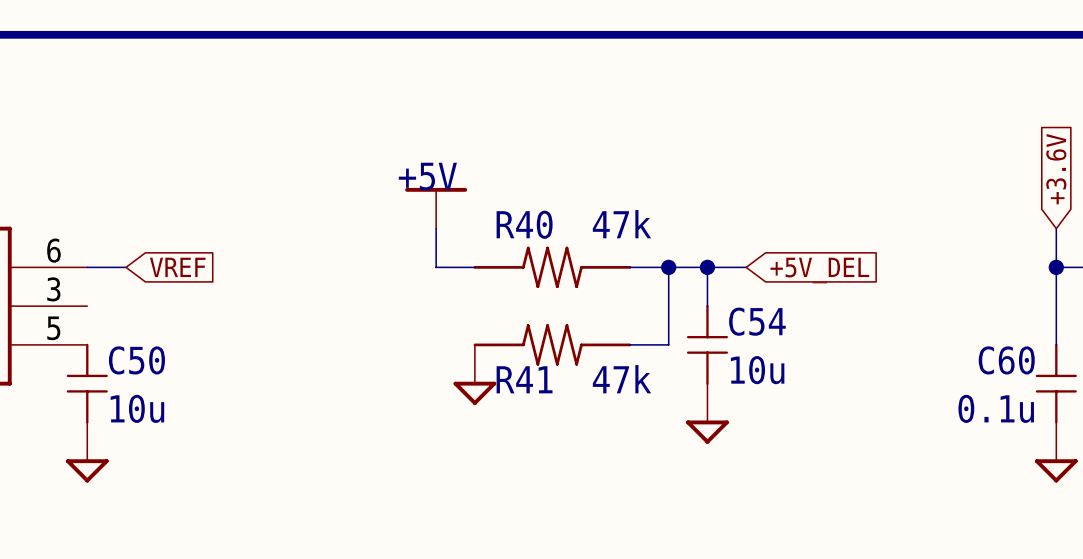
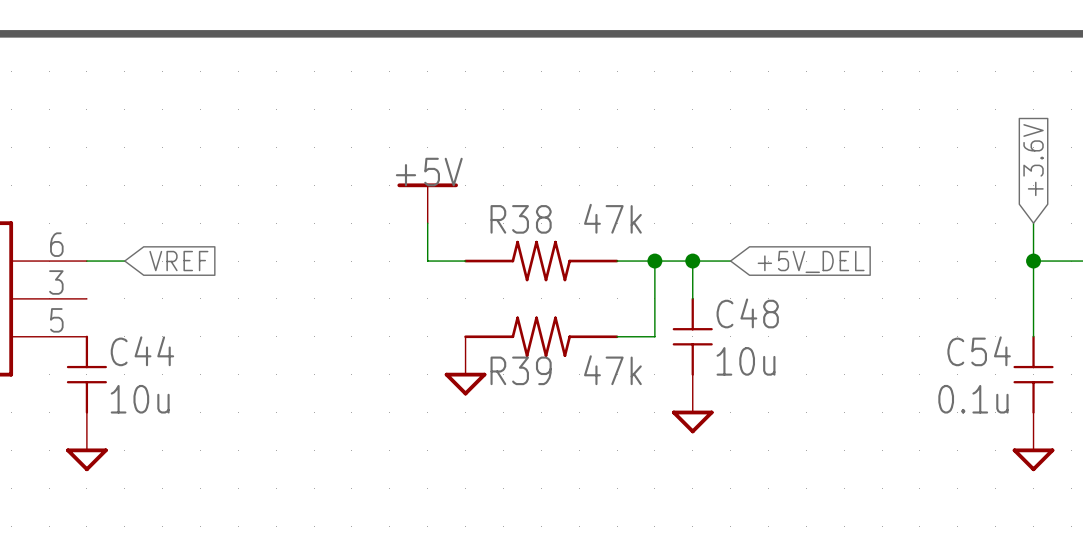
R40 name: R40 (524, 224) -> R38 (521, 219)
C54 name: C54 (757, 321) -> C48 (747, 313)
C50 name: C50 (136, 360) -> C44 (142, 351)
C60 name: C60 (1006, 360) -> C54 (979, 351)
R41 name: R41 (524, 379) -> R39 (521, 370)

